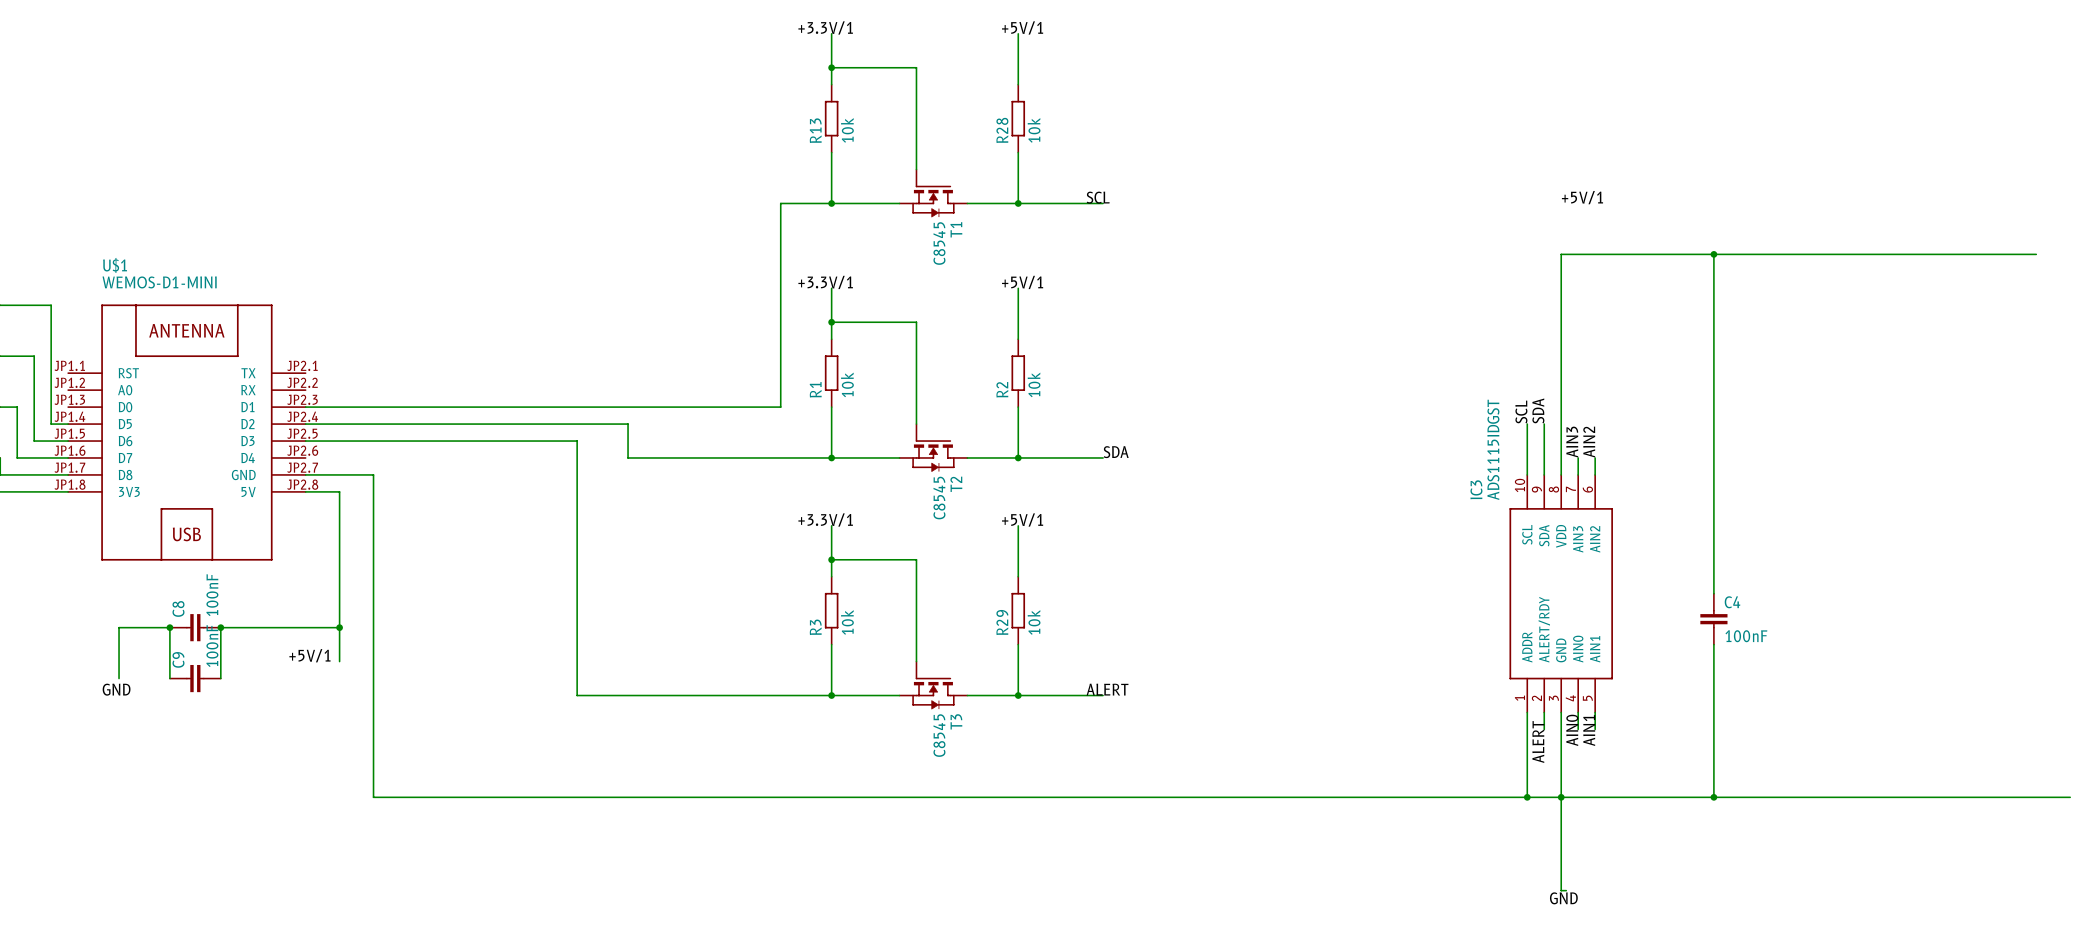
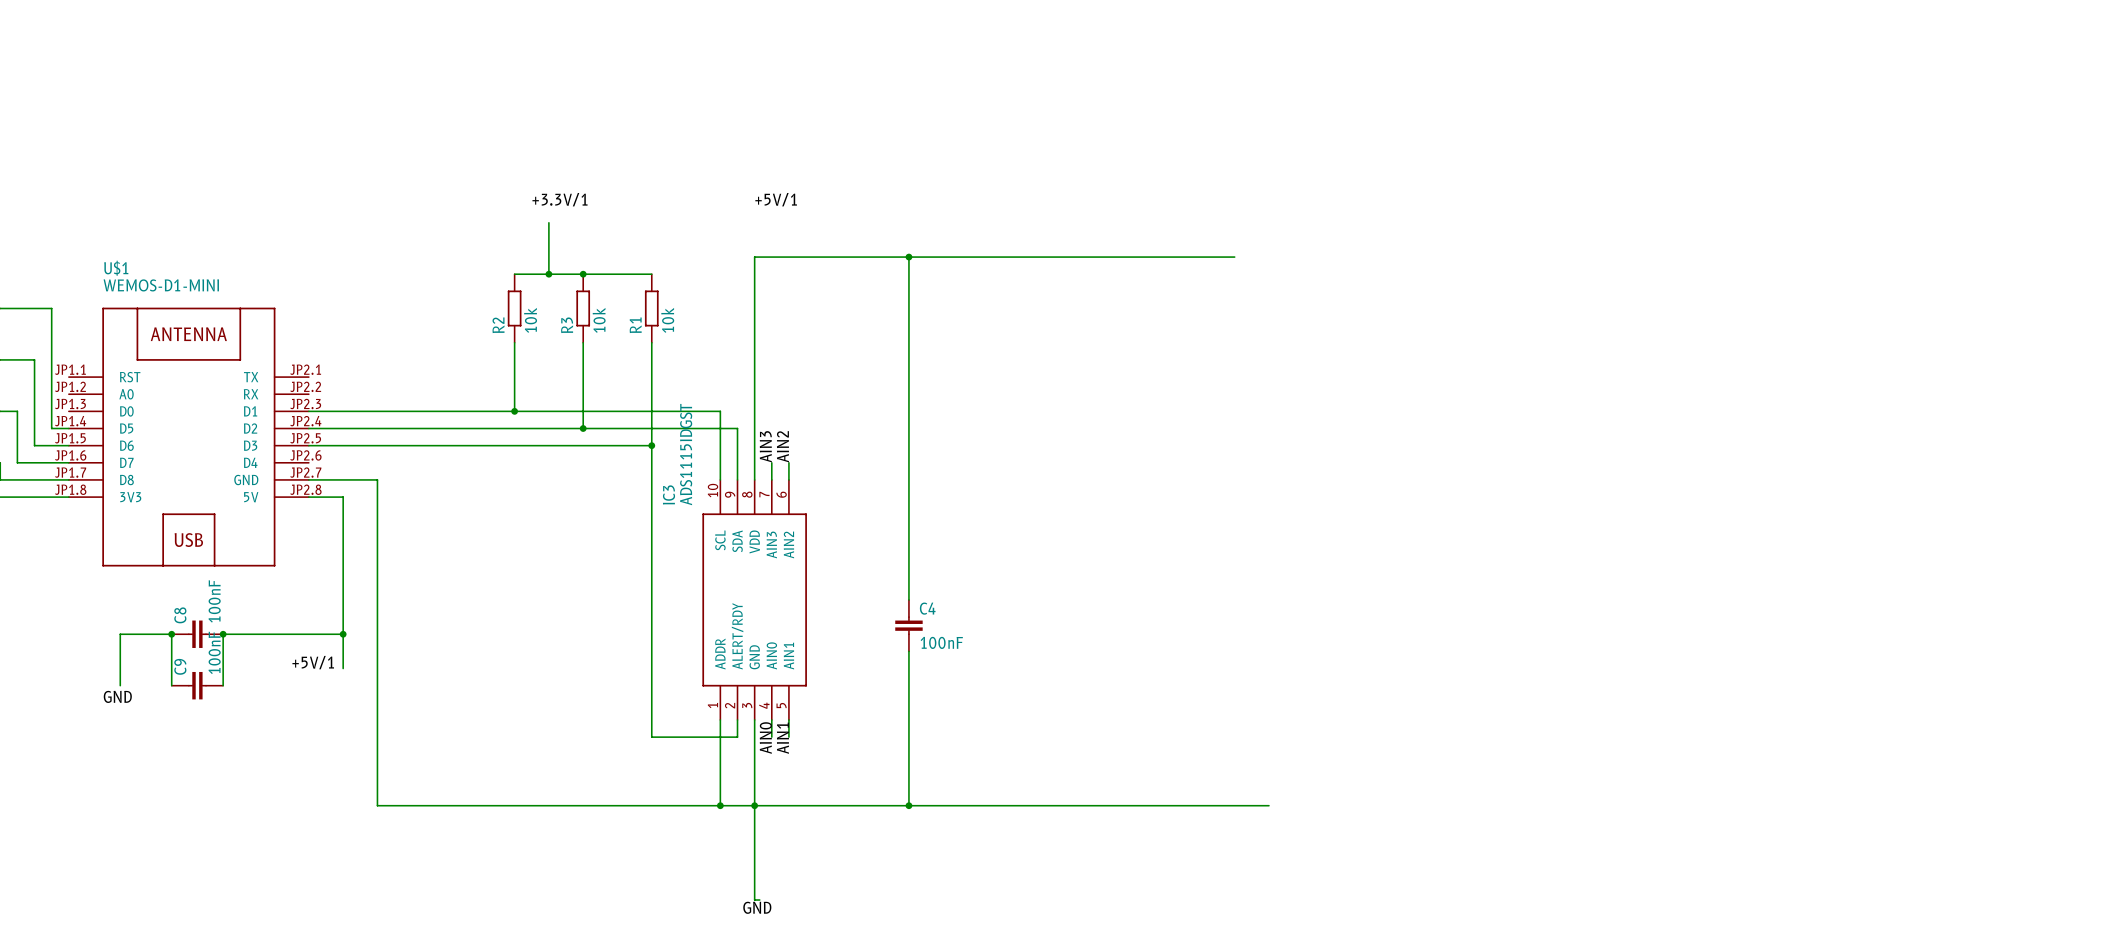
label: +3.3V/1 (825, 27) -> none
label: +5V/1 (1022, 27) -> none
wire: (831, 33) (831, 84) -> none
wire: (1018, 33) (1018, 84) -> none
wire: (831, 67) (916, 67) (916, 169) -> none
junction: (831, 67) -> none
R13: 10k (831, 118) -> none
R28: 10k (1018, 118) -> none
wire: (831, 152) (831, 203) -> none
wire: (1018, 152) (1018, 203) -> none
T1: C8545 (933, 193) -> none
label: none -> +3.3V/1 (560, 199)
label: none -> +5V/1 (776, 199)
label: SCL (1098, 197) -> none
label: +5V/1 (1582, 197) -> none
junction: (831, 203) -> none
wire: (899, 203) (780, 203) (780, 407) (712, 407) -> (720, 479) (720, 411)
wire: (967, 203) (1103, 203) -> none
junction: (1018, 203) -> none
wire: none -> (548, 222) (548, 274)
wire: none -> (908, 257) (908, 599)
junction: none -> (908, 257)
wire: none -> (1234, 257) (754, 257) (754, 479)
wire: (1713, 254) (1713, 593) -> none
junction: (1713, 254) -> none
wire: (2036, 254) (1561, 254) (1561, 474) -> none
wire: none -> (514, 274) (651, 274)
junction: none -> (548, 274)
junction: none -> (583, 274)
label: +3.3V/1 (825, 282) -> none
label: +5V/1 (1022, 282) -> none
wire: (831, 288) (831, 339) -> none
wire: (1018, 288) (1018, 339) -> none
wire: (831, 322) (916, 322) (916, 424) -> none
junction: (831, 322) -> none
wire: none -> (514, 342) (514, 411)
wire: none -> (583, 342) (583, 428)
wire: none -> (651, 342) (651, 737) (737, 737) (737, 719)
R1 position: (831, 373) -> (651, 308)
R2 position: (1018, 373) -> (514, 308)
junction: none -> (514, 411)
wire: (831, 407) (831, 457) -> none
wire: (1018, 407) (1018, 457) -> none
label: SDA (1538, 410) -> none
label: SCL (1521, 412) -> none
junction: none -> (583, 428)
wire: (628, 424) (628, 457) (899, 457) -> (634, 428) (737, 428) (737, 479)
wire: (1527, 424) (1527, 474) -> none
wire: (1544, 424) (1544, 474) -> none
wire: (577, 441) (577, 695) (899, 695) -> (583, 445) (651, 445)
junction: none -> (651, 445)
label: none -> AIN3 (765, 446)
label: none -> AIN2 (782, 446)
label: AIN3 (1572, 442) -> none
label: AIN2 (1589, 442) -> none
T2: C8545 (933, 447) -> none
label: SDA (1116, 452) -> none
wire: none -> (771, 462) (771, 479)
wire: none -> (788, 462) (788, 479)
junction: (831, 457) -> none
wire: (967, 457) (1103, 457) -> none
junction: (1018, 457) -> none
wire: (1578, 457) (1578, 474) -> none
wire: (1595, 457) (1595, 474) -> none
label: +3.3V/1 (825, 520) -> none
label: +5V/1 (1022, 520) -> none
wire: (831, 525) (831, 576) -> none
wire: (1018, 525) (1018, 576) -> none
wire: (831, 559) (916, 559) (916, 661) -> none
junction: (831, 559) -> none
IC3 position: (1561, 593) -> (754, 599)
R3 position: (831, 610) -> (583, 308)
R29: 10k (1018, 610) -> none
C4 position: (1713, 619) -> (908, 625)
wire: (831, 644) (831, 695) -> none
wire: none -> (908, 651) (908, 805)
wire: (1018, 644) (1018, 695) -> none
wire: (1713, 644) (1713, 797) -> none
T3: C8545 (933, 685) -> none
label: ALERT (1107, 689) -> none
junction: (831, 695) -> none
wire: (967, 695) (1103, 695) -> none
junction: (1018, 695) -> none
wire: none -> (720, 719) (720, 805)
wire: none -> (754, 719) (754, 900) (759, 900)
wire: none -> (771, 719) (771, 737)
wire: none -> (788, 719) (788, 737)
wire: (1527, 712) (1527, 797) -> none
wire: (1544, 712) (1544, 729) -> none
wire: (1561, 712) (1561, 890) (1566, 890) -> none
wire: (1578, 712) (1578, 729) -> none
wire: (1595, 712) (1595, 729) -> none
label: none -> AIN0 (765, 738)
label: none -> AIN1 (782, 738)
label: AIN0 (1572, 730) -> none
label: AIN1 (1589, 730) -> none
label: ALERT (1538, 742) -> none
junction: none -> (720, 805)
junction: none -> (754, 805)
junction: none -> (908, 805)
wire: (1255, 797) (2070, 797) -> none
junction: (1527, 797) -> none
junction: (1561, 797) -> none
junction: (1713, 797) -> none
label: none -> GND (757, 907)
label: GND (1563, 898) -> none

